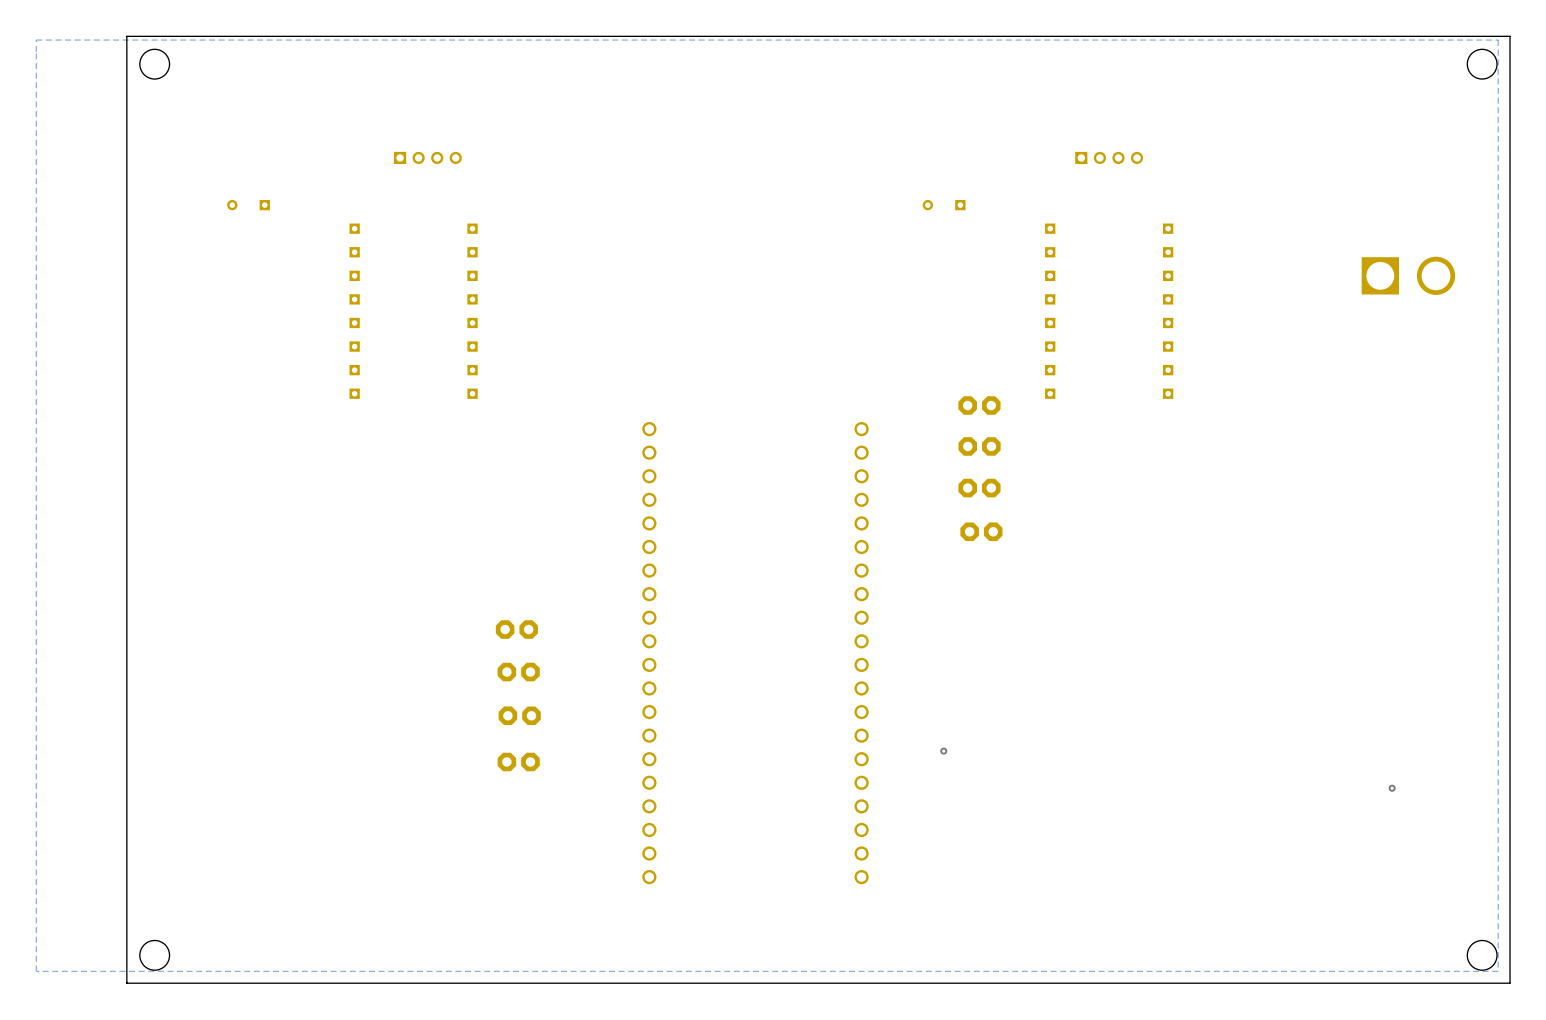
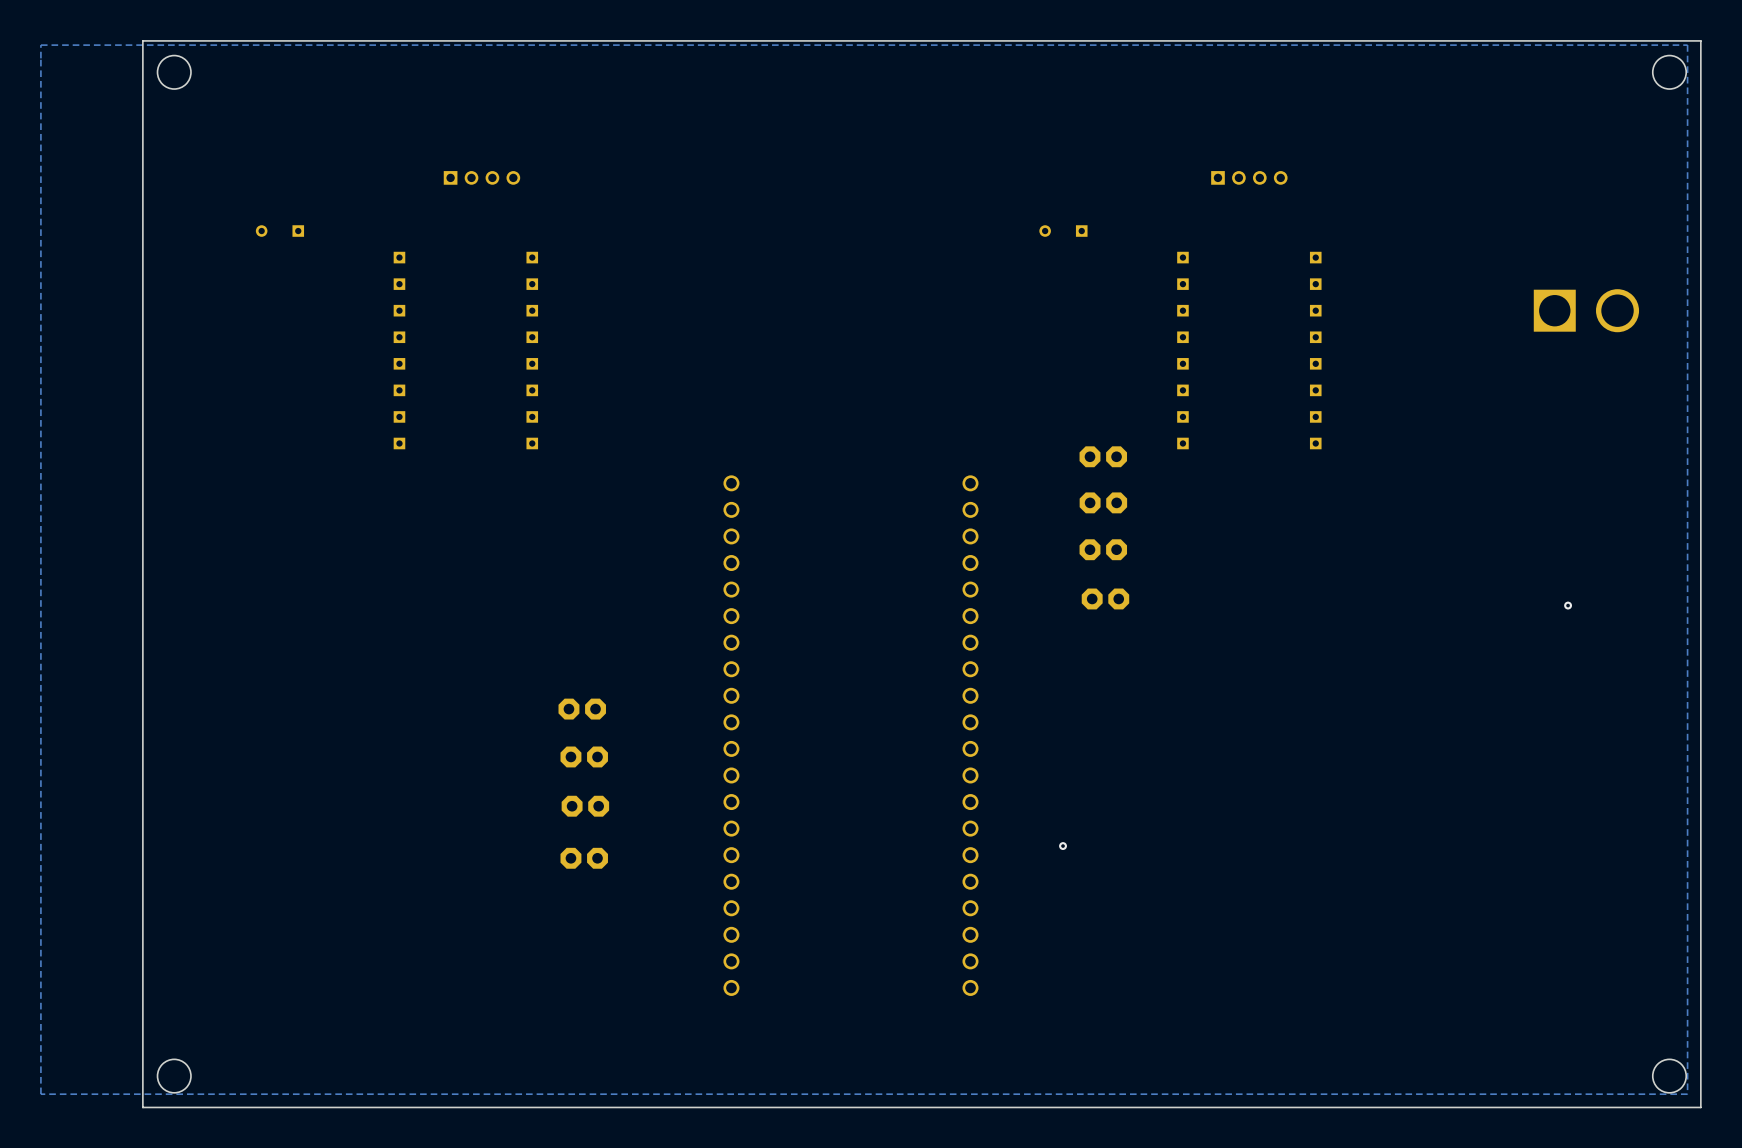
via: none -> (1568, 605)
via: (1392, 788) -> none

